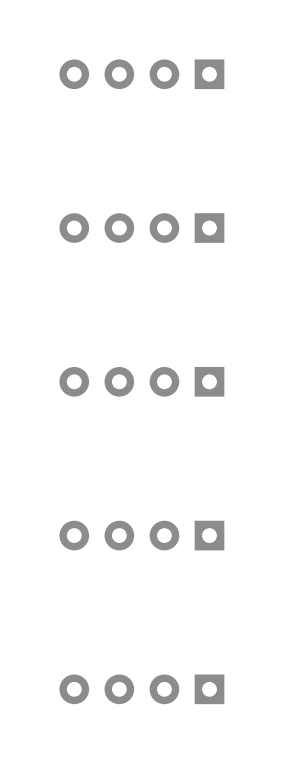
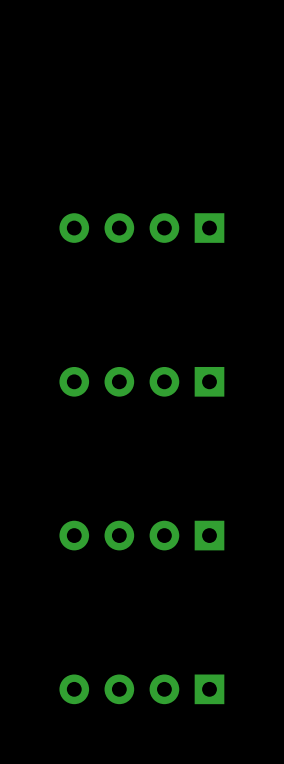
part: (141, 74) -> none

